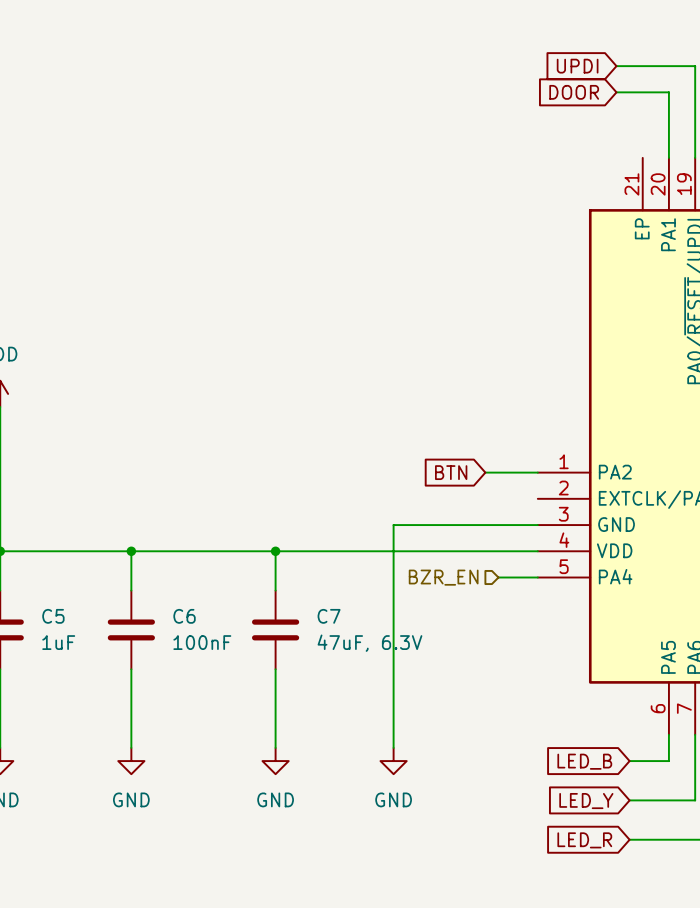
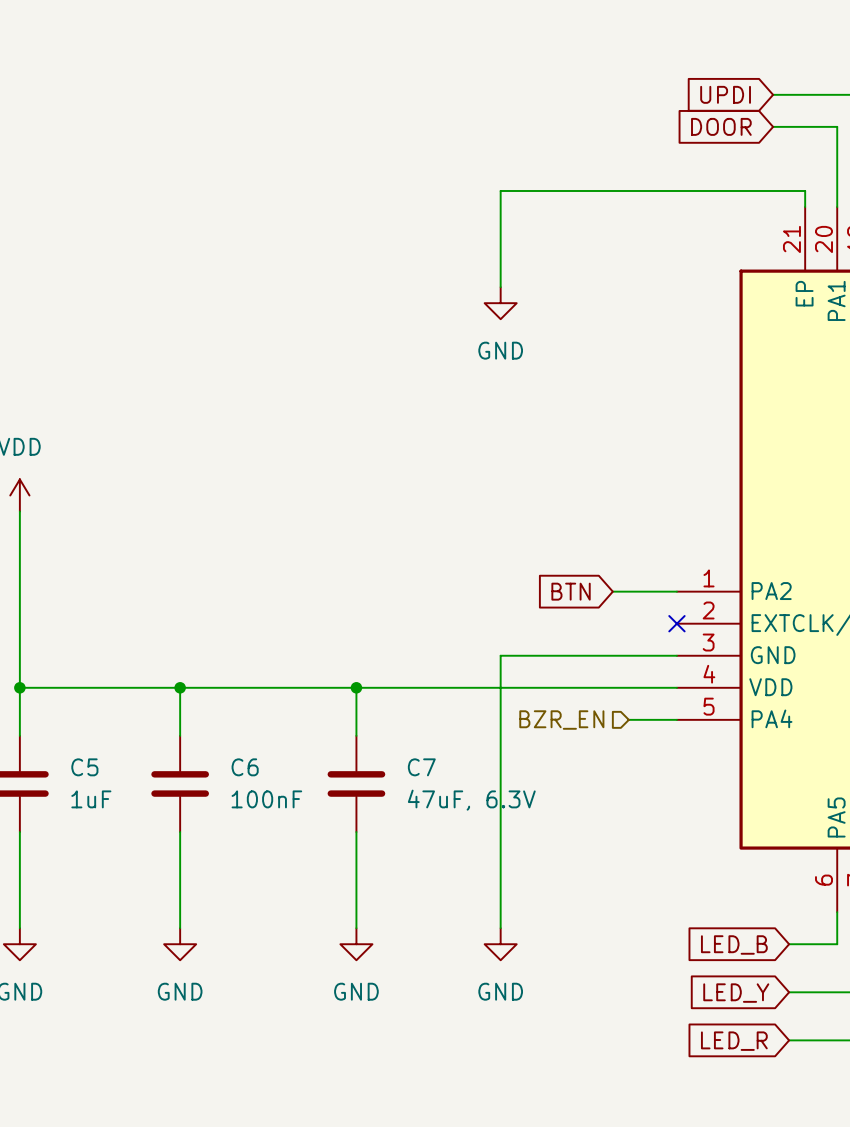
wire: none -> (805, 207) (805, 190) (500, 190) (500, 287)
power symbol: none -> GND (500, 303)
no-connect mark: none -> (676, 623)

